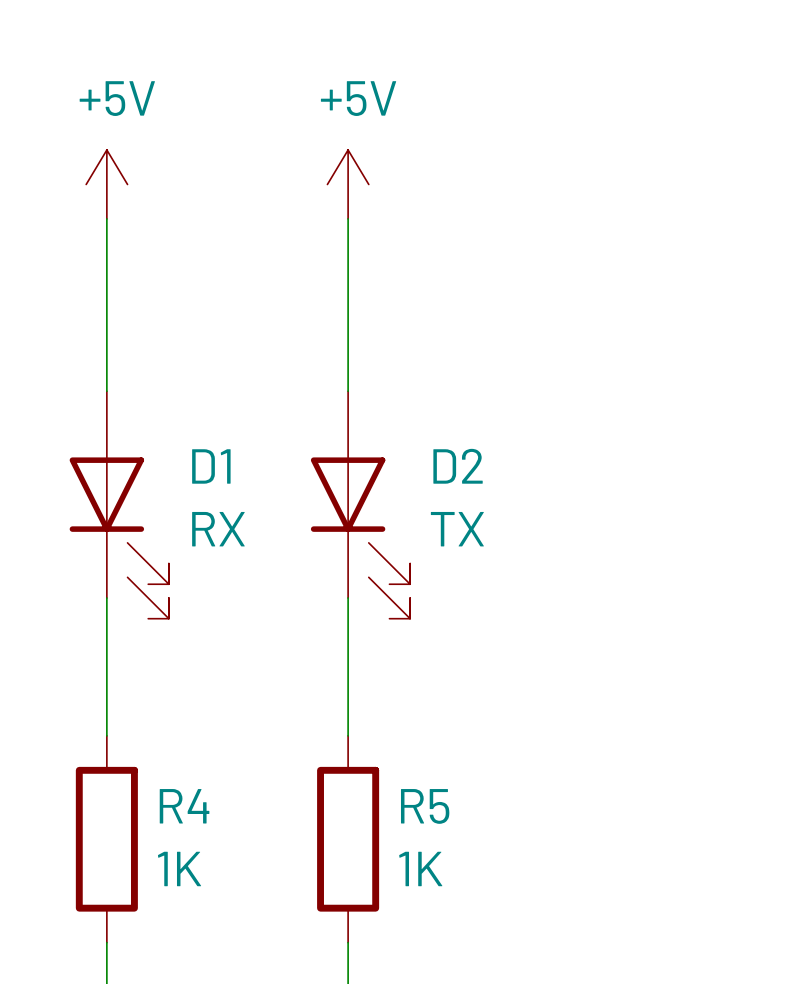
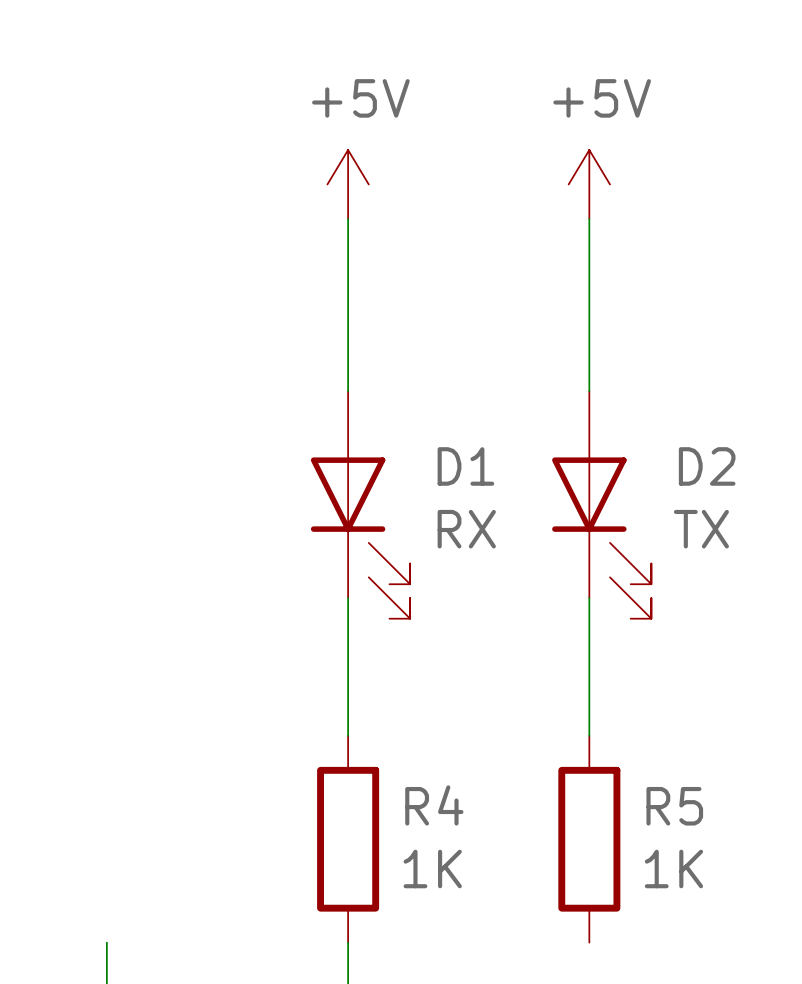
power symbol: +5V (106, 184) -> none
power symbol: none -> +5V (589, 184)
wire: (106, 218) (106, 391) -> (589, 218) (589, 391)
D2 name: D2 (458, 466) -> D1 (465, 466)
D1: RX (119, 504) -> none
D2: none -> TX (601, 504)
D2 value: TX (457, 529) -> RX (466, 529)
wire: (106, 598) (106, 735) -> (589, 598) (589, 735)
R5 name: R5 (425, 806) -> R4 (434, 805)
R4: 1K (106, 839) -> none
R5: none -> 1K (589, 839)

